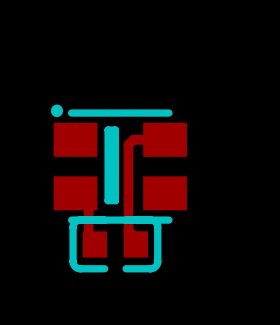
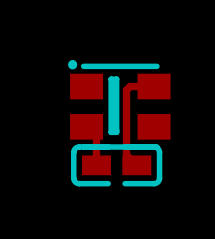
part footprint: [69, 216, 162, 273] -> [71, 144, 163, 187]

